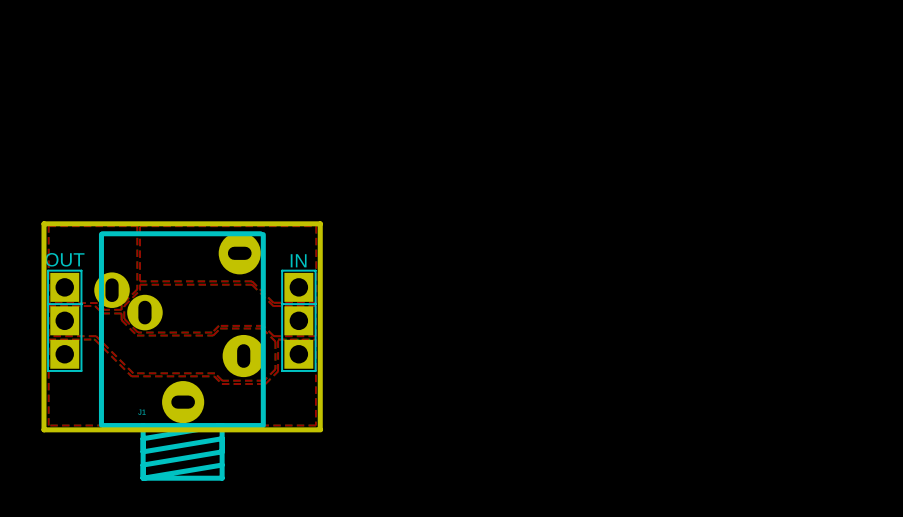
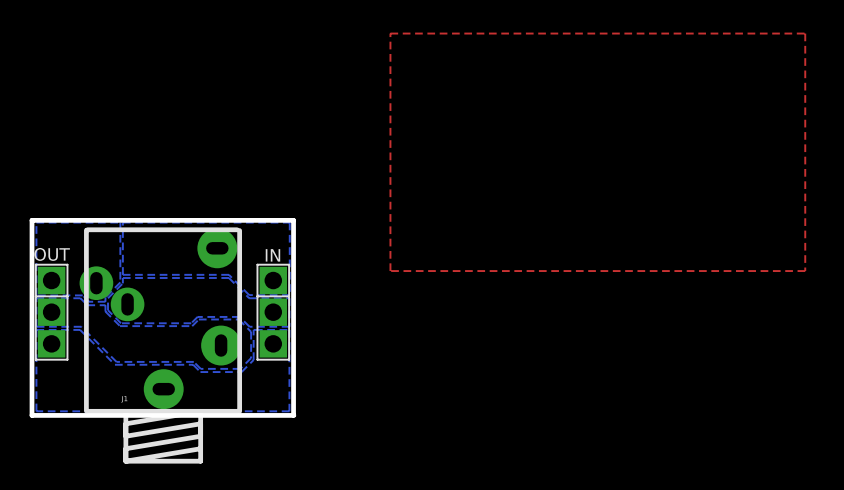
top zone outline: none -> (390, 33) (390, 271) (805, 271) (805, 33) (390, 33)
top zone outline: (48, 226) (48, 303) (97, 303) (104, 309) (121, 309) (121, 305) (137, 289) (137, 226) (48, 226) -> none
top zone outline: (139, 226) (316, 226) (316, 302) (273, 302) (252, 281) (139, 281) (139, 226) -> none
top zone outline: (139, 284) (139, 290) (124, 306) (124, 318) (137, 332) (212, 332) (218, 325) (263, 325) (273, 336) (315, 336) (315, 306) (273, 306) (252, 284) (139, 284) -> none
top zone outline: (48, 306) (48, 336) (96, 336) (133, 373) (214, 373) (222, 380) (264, 380) (275, 369) (275, 341) (262, 328) (220, 328) (213, 335) (136, 335) (121, 320) (121, 313) (102, 313) (95, 306) (48, 306) -> none
top zone outline: (48, 339) (48, 425) (315, 425) (315, 339) (278, 339) (278, 371) (265, 384) (221, 384) (214, 376) (131, 376) (94, 339) (48, 339) -> none

